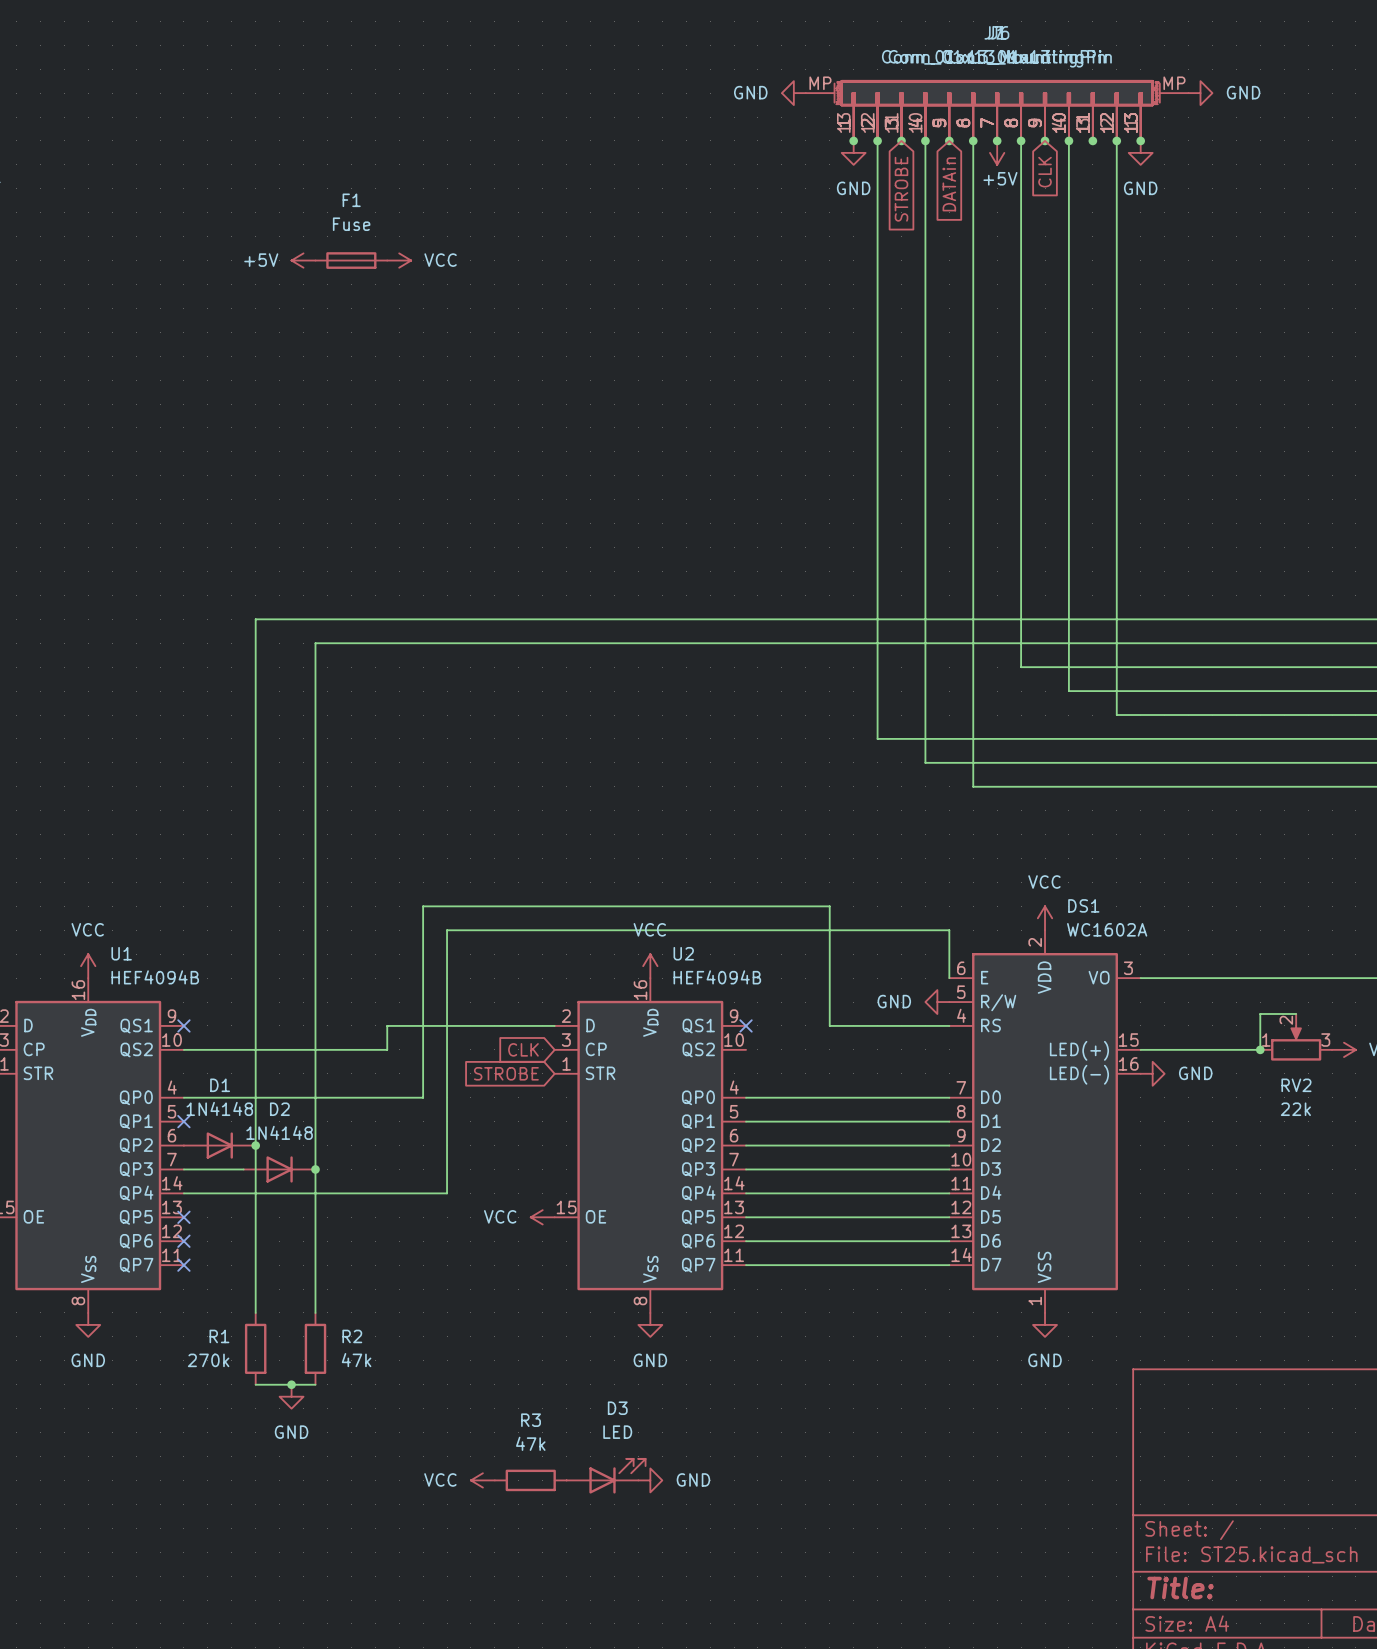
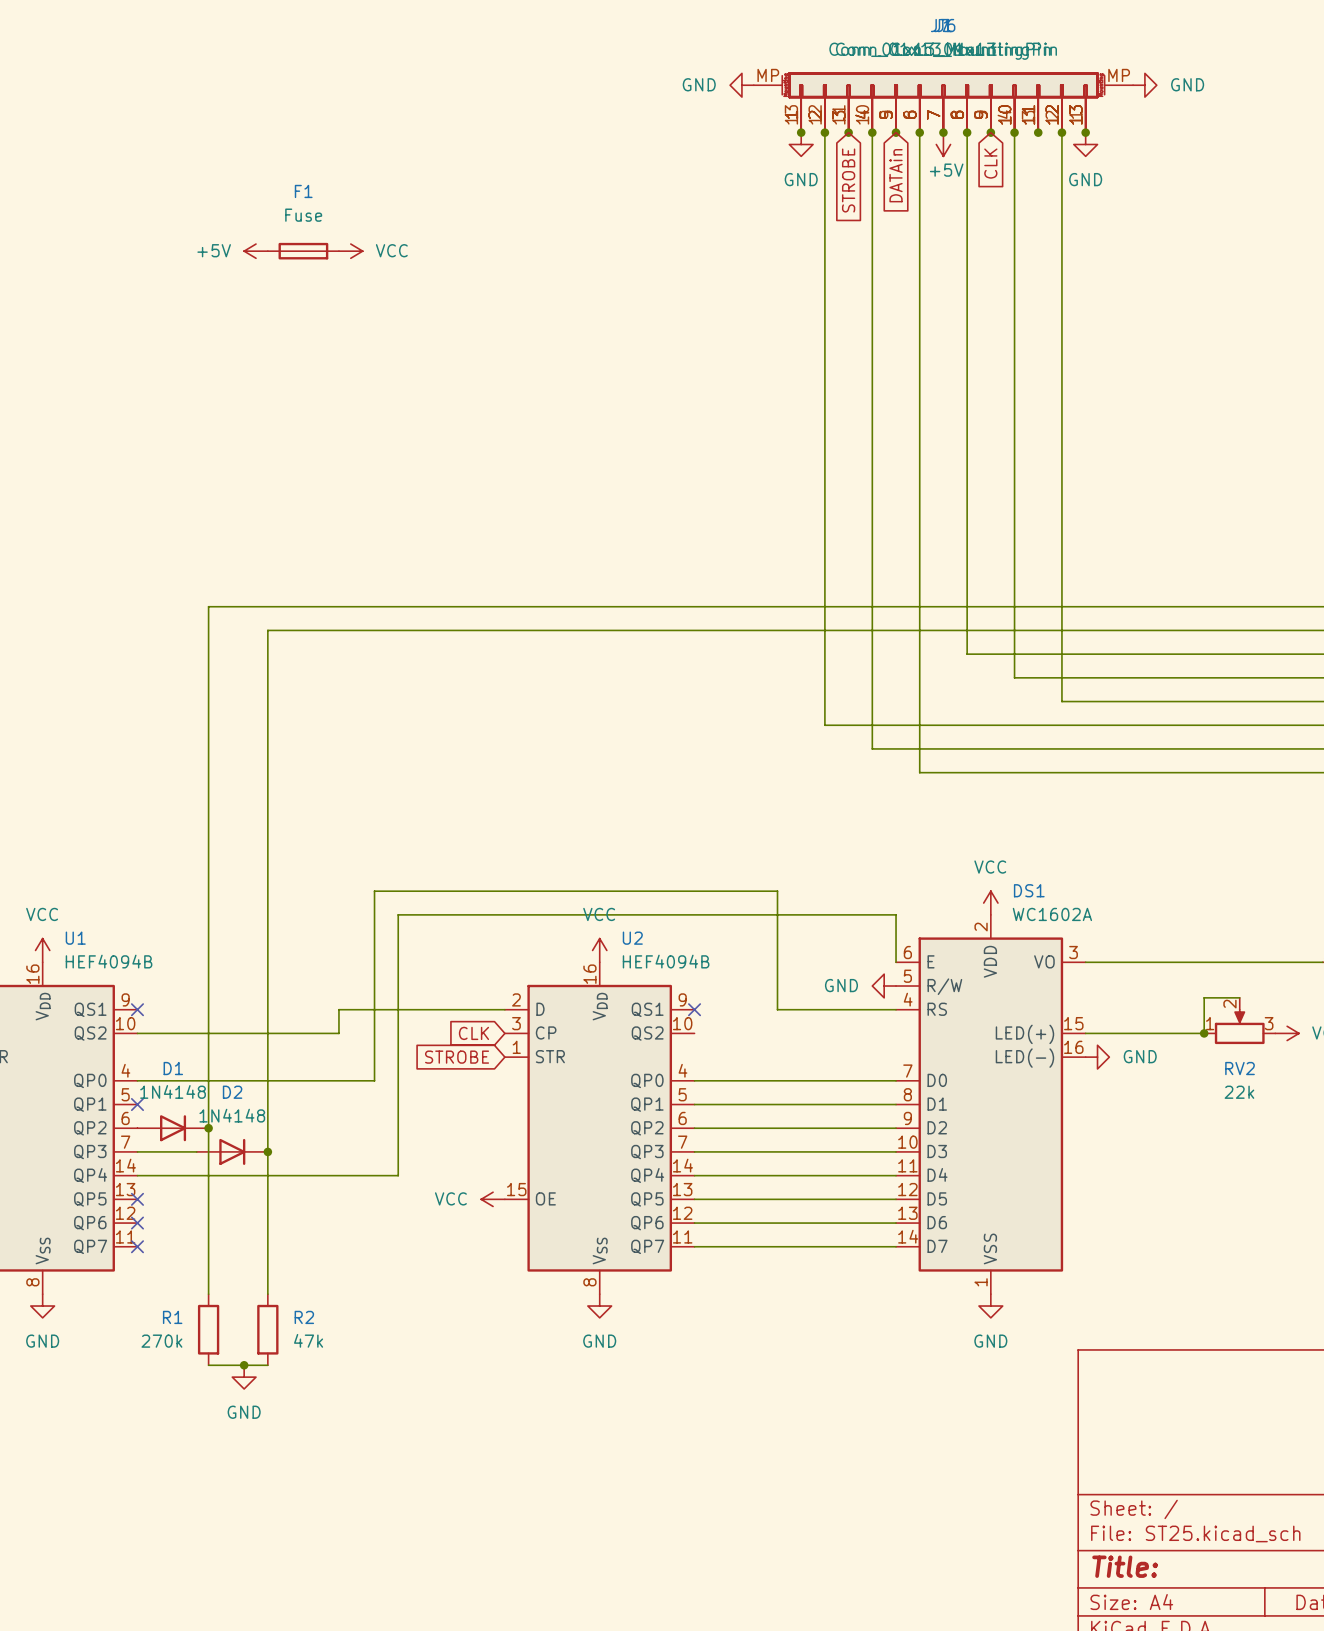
D3: LED (606, 1476) -> none
power symbol: VCC (482, 1480) -> none
R3: 47k (530, 1480) -> none
power symbol: GND (650, 1480) -> none

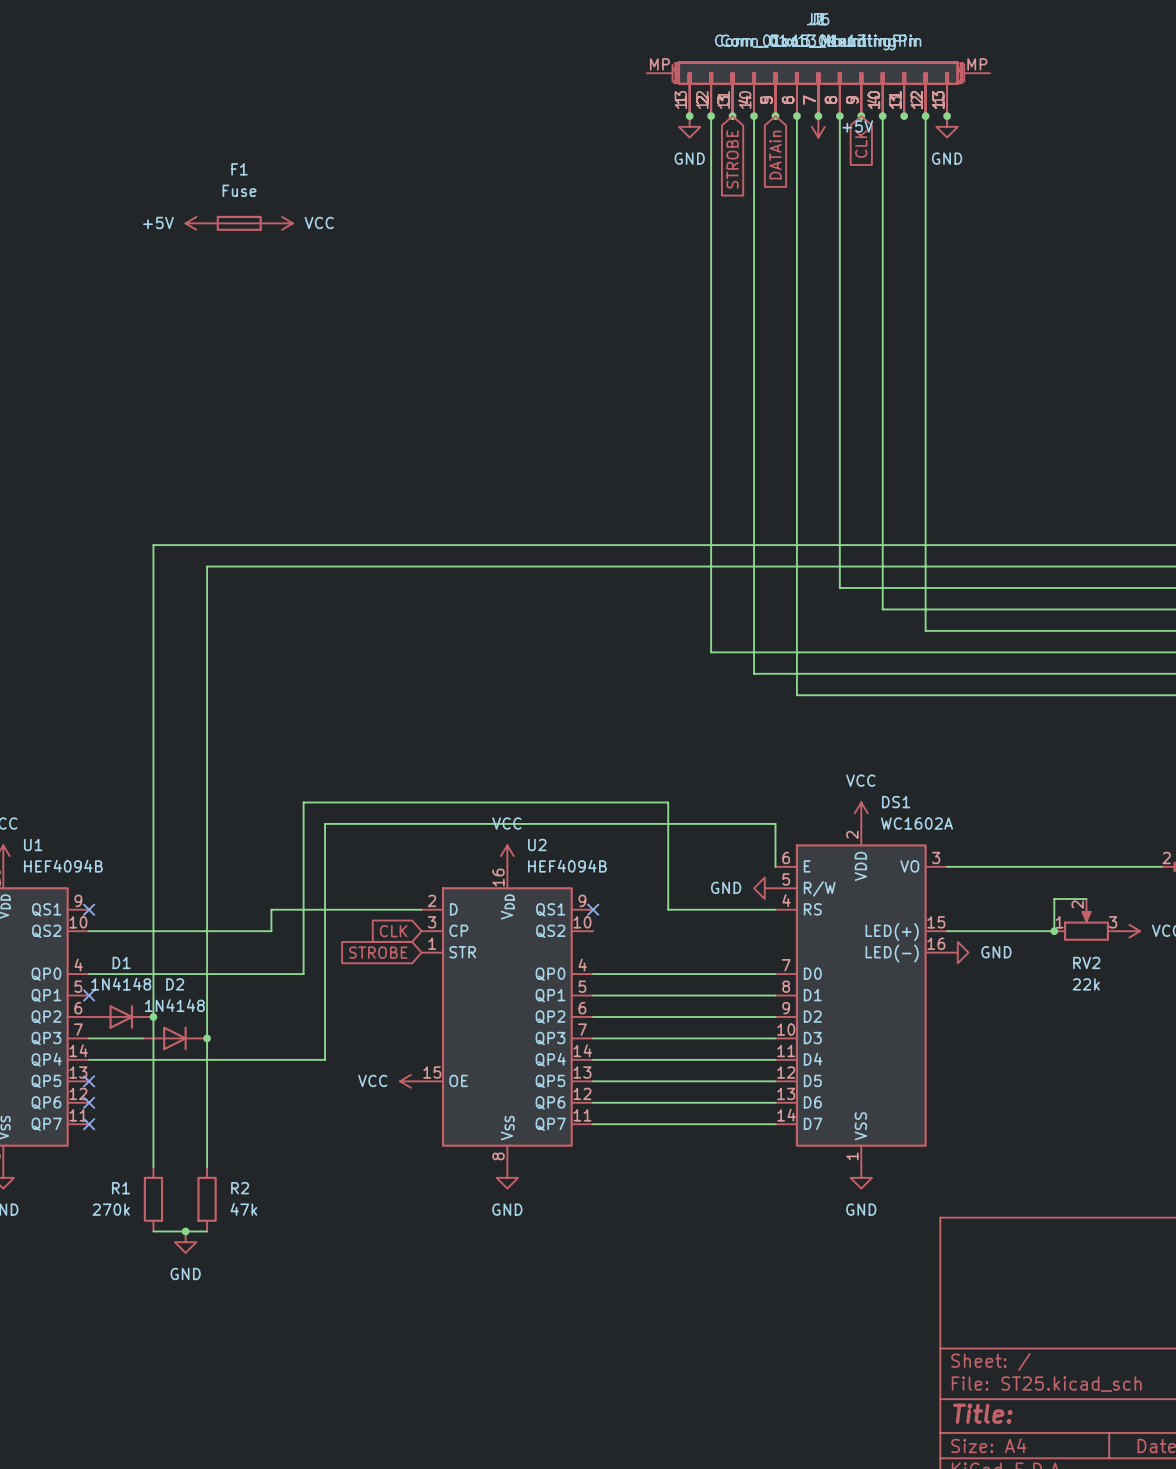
power symbol: GND (741, 85) -> none
power symbol: GND (1144, 85) -> none
power symbol text position: +5V (946, 170) -> +5V (857, 126)

